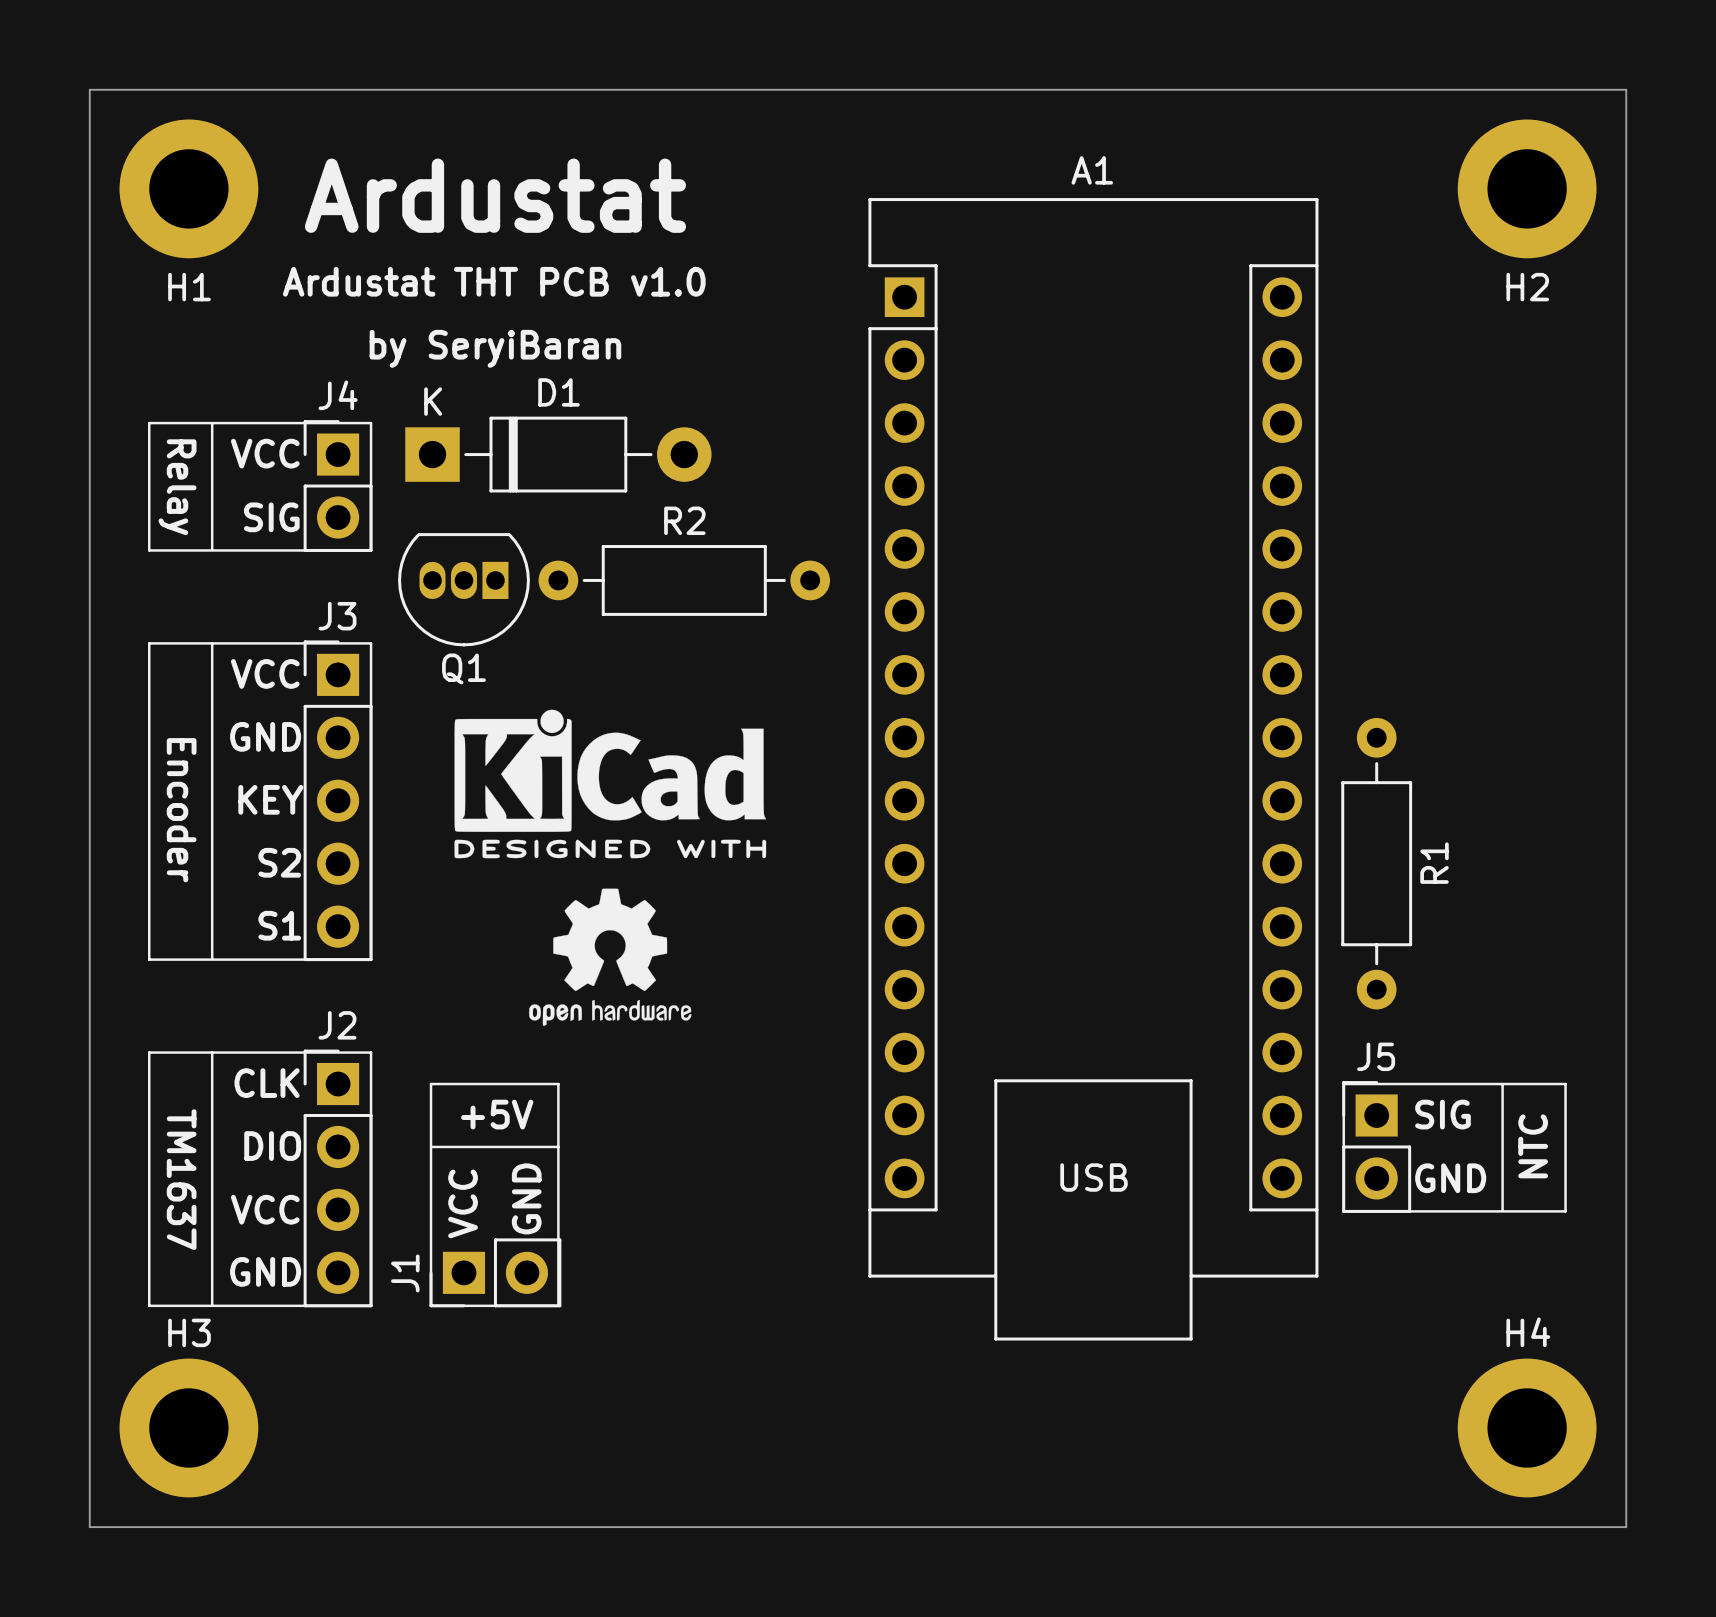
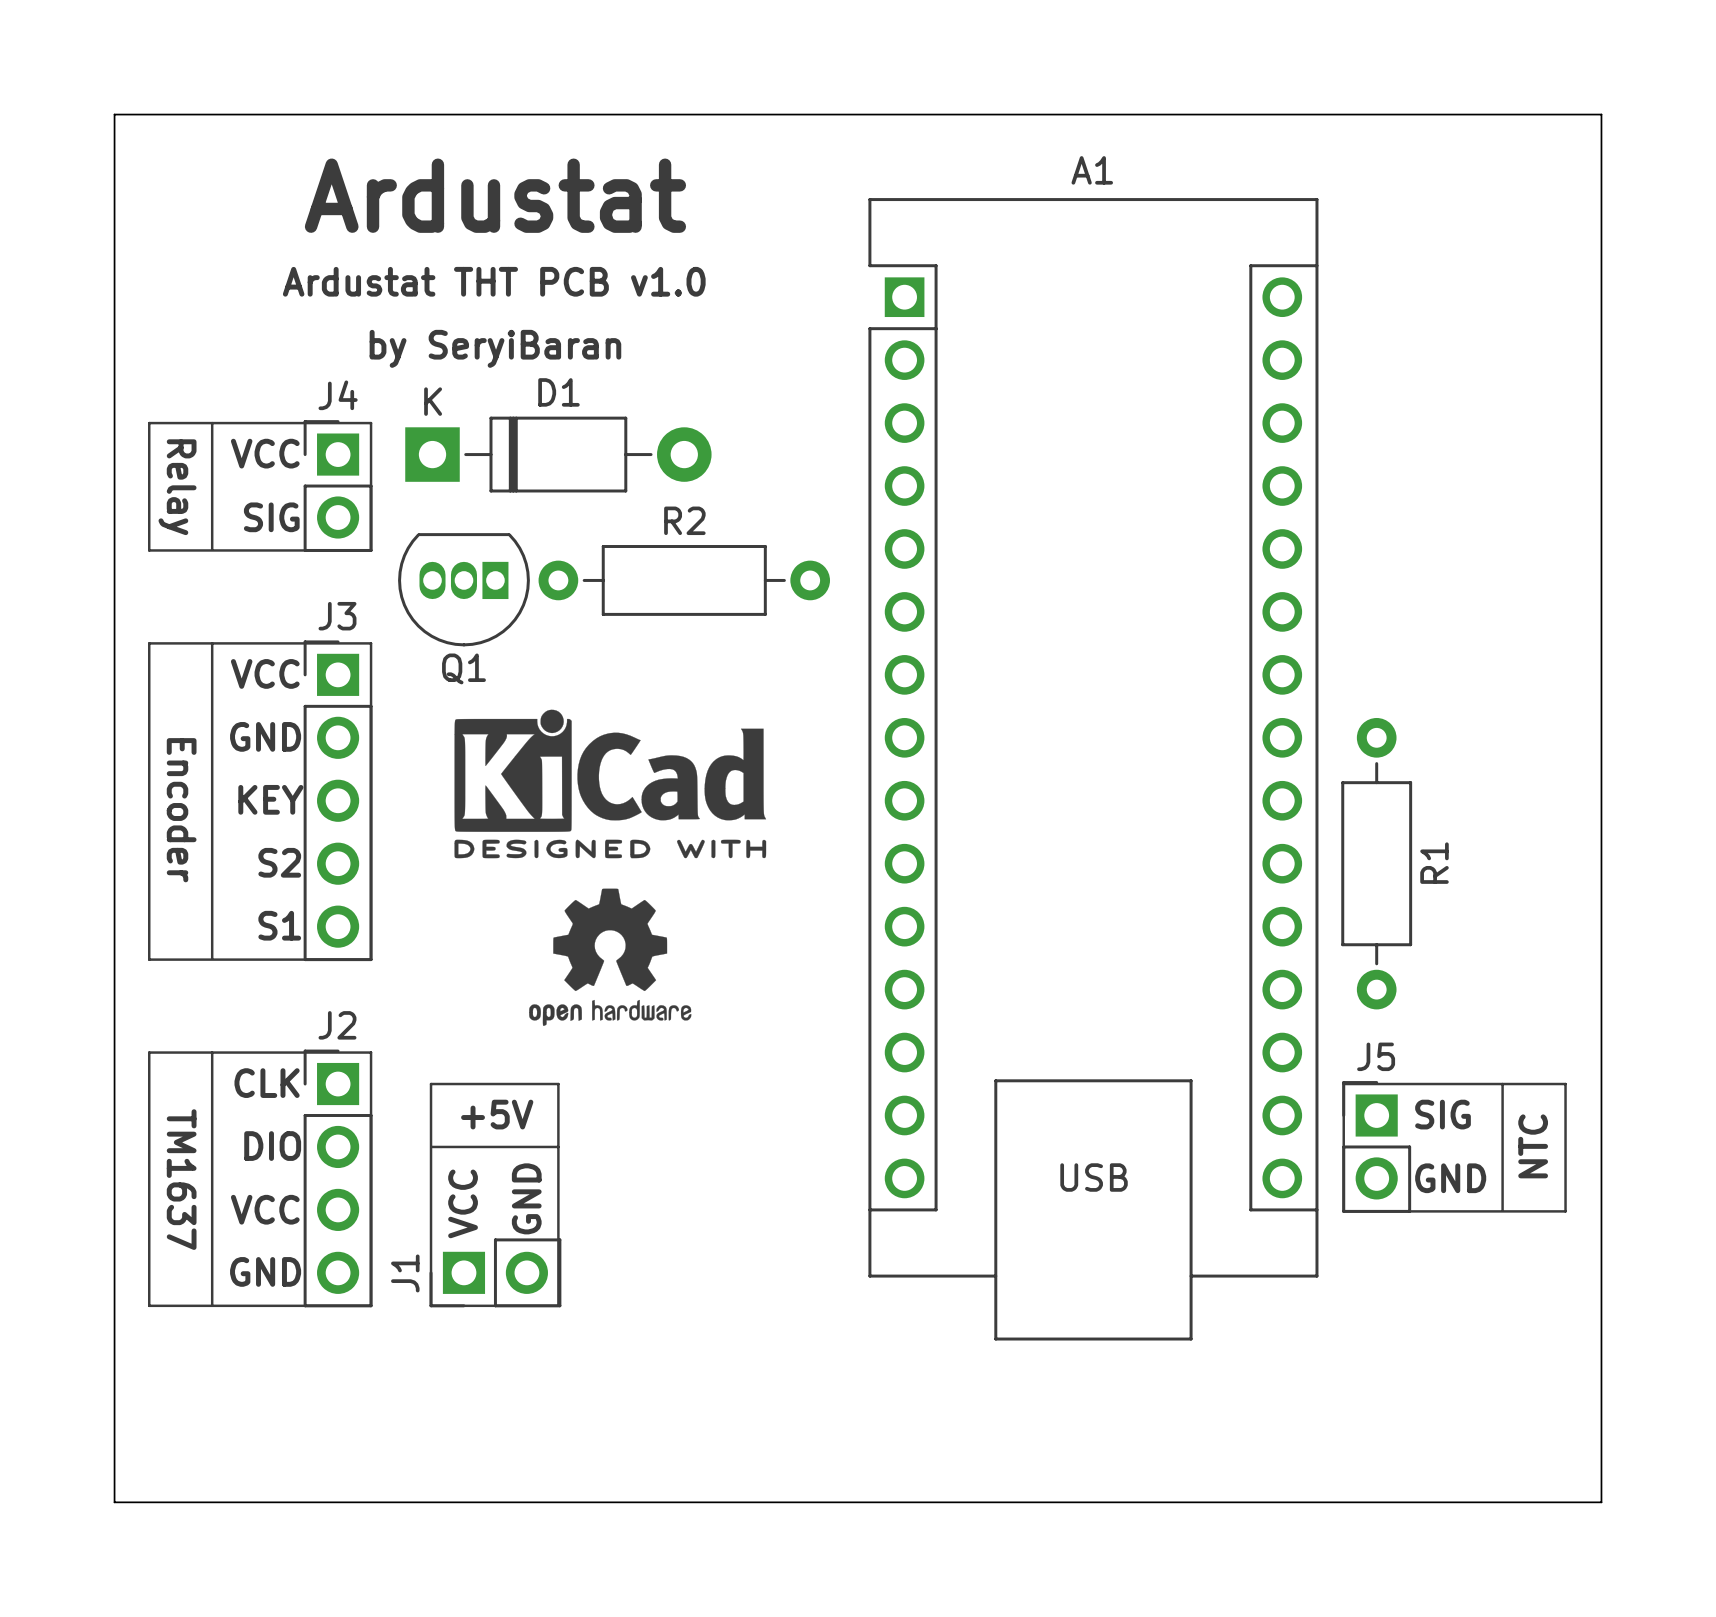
board edge: (89, 89) (1626, 89) (1626, 1527) (89, 1527) (89, 89) -> (114, 114) (114, 1502) (1601, 1502) (1601, 114) (114, 114)
H1: (188, 188) -> none
H2: (1527, 188) -> none
H3: (188, 1427) -> none
H4: (1527, 1427) -> none

